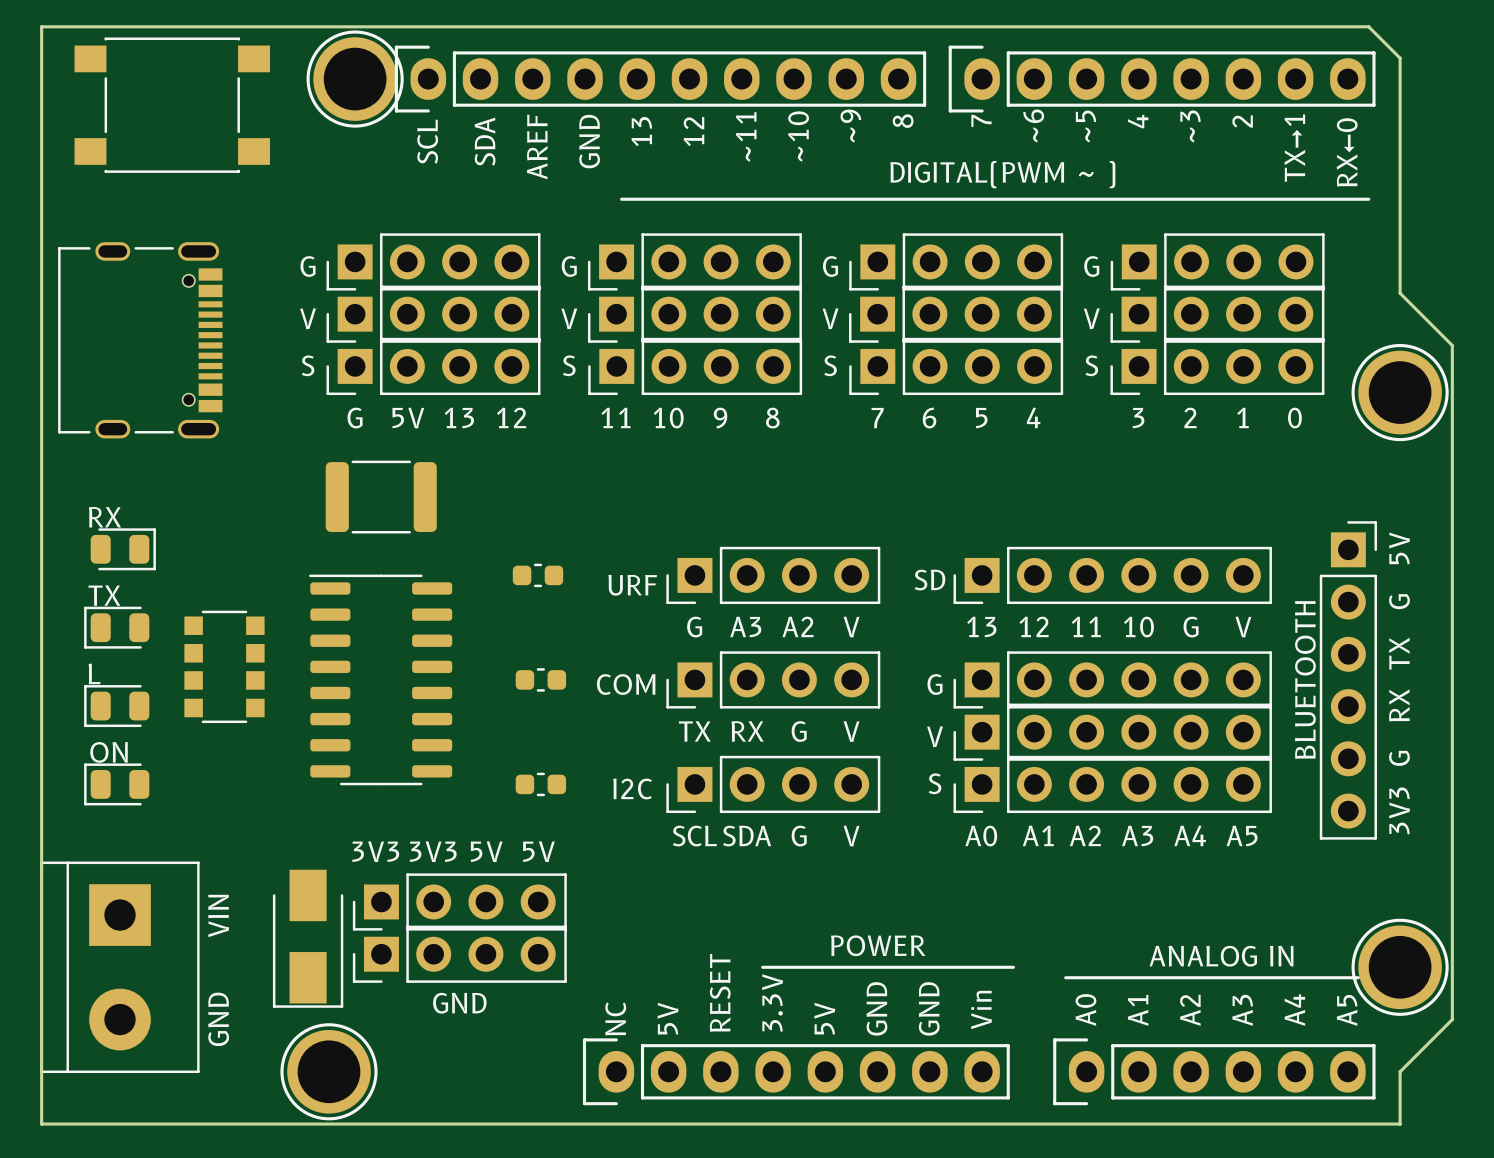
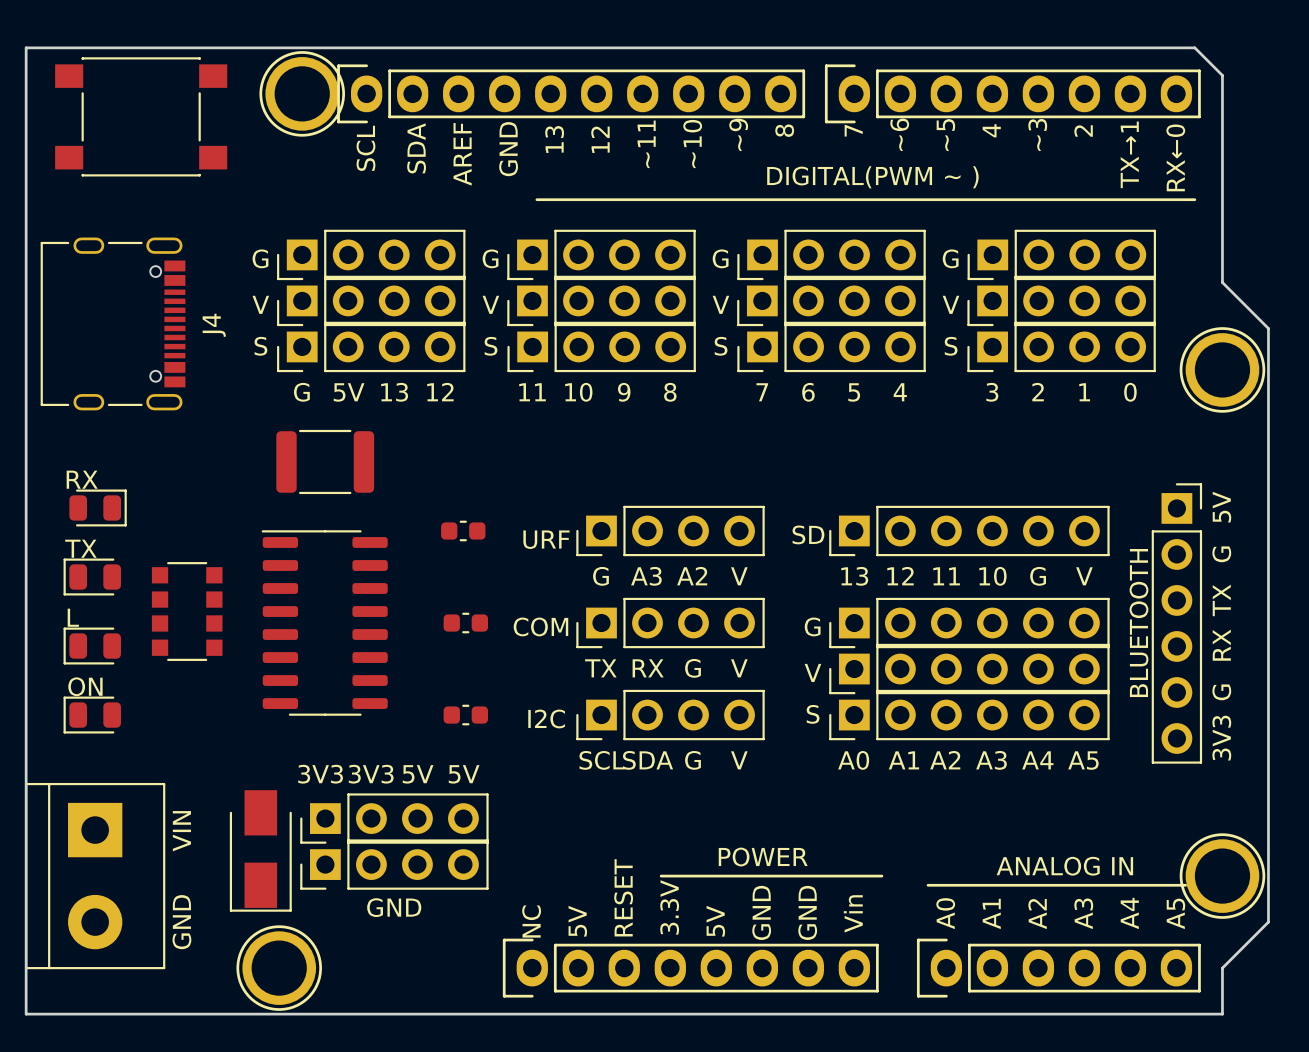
J4 name: none -> J4 (214, 325)

